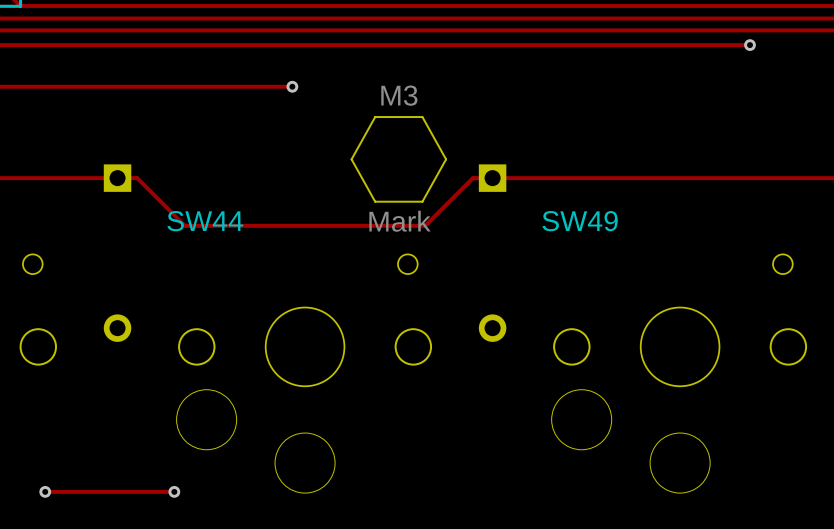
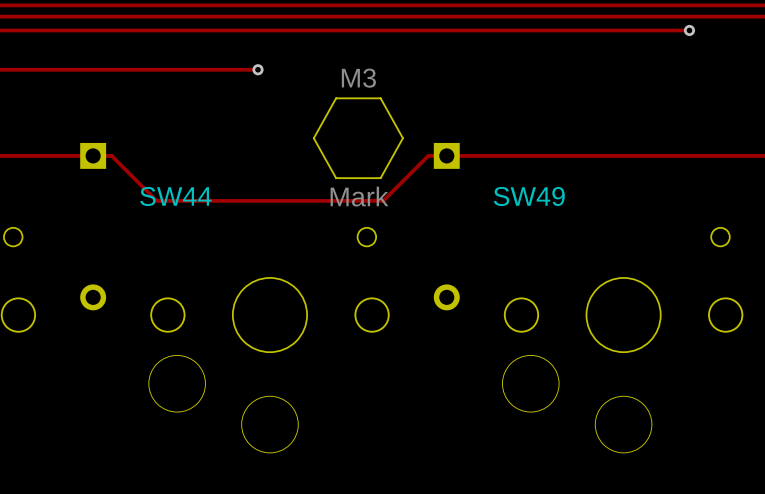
track: (45, 491) (174, 491) -> none
via: (45, 491) -> none
via: (174, 491) -> none

